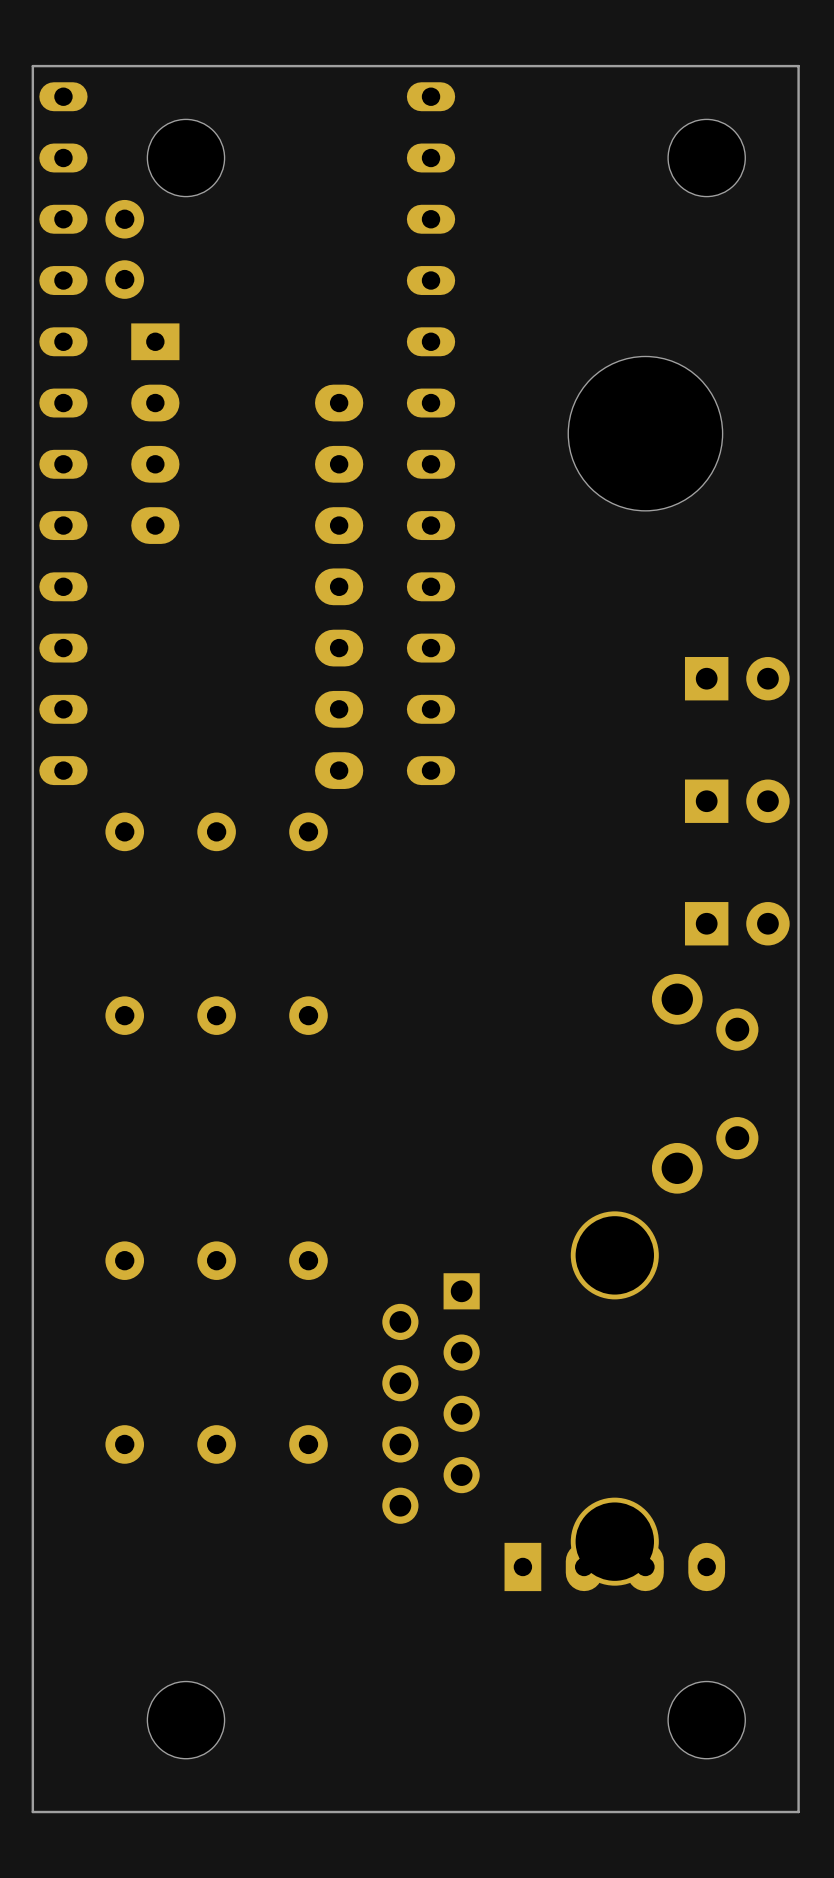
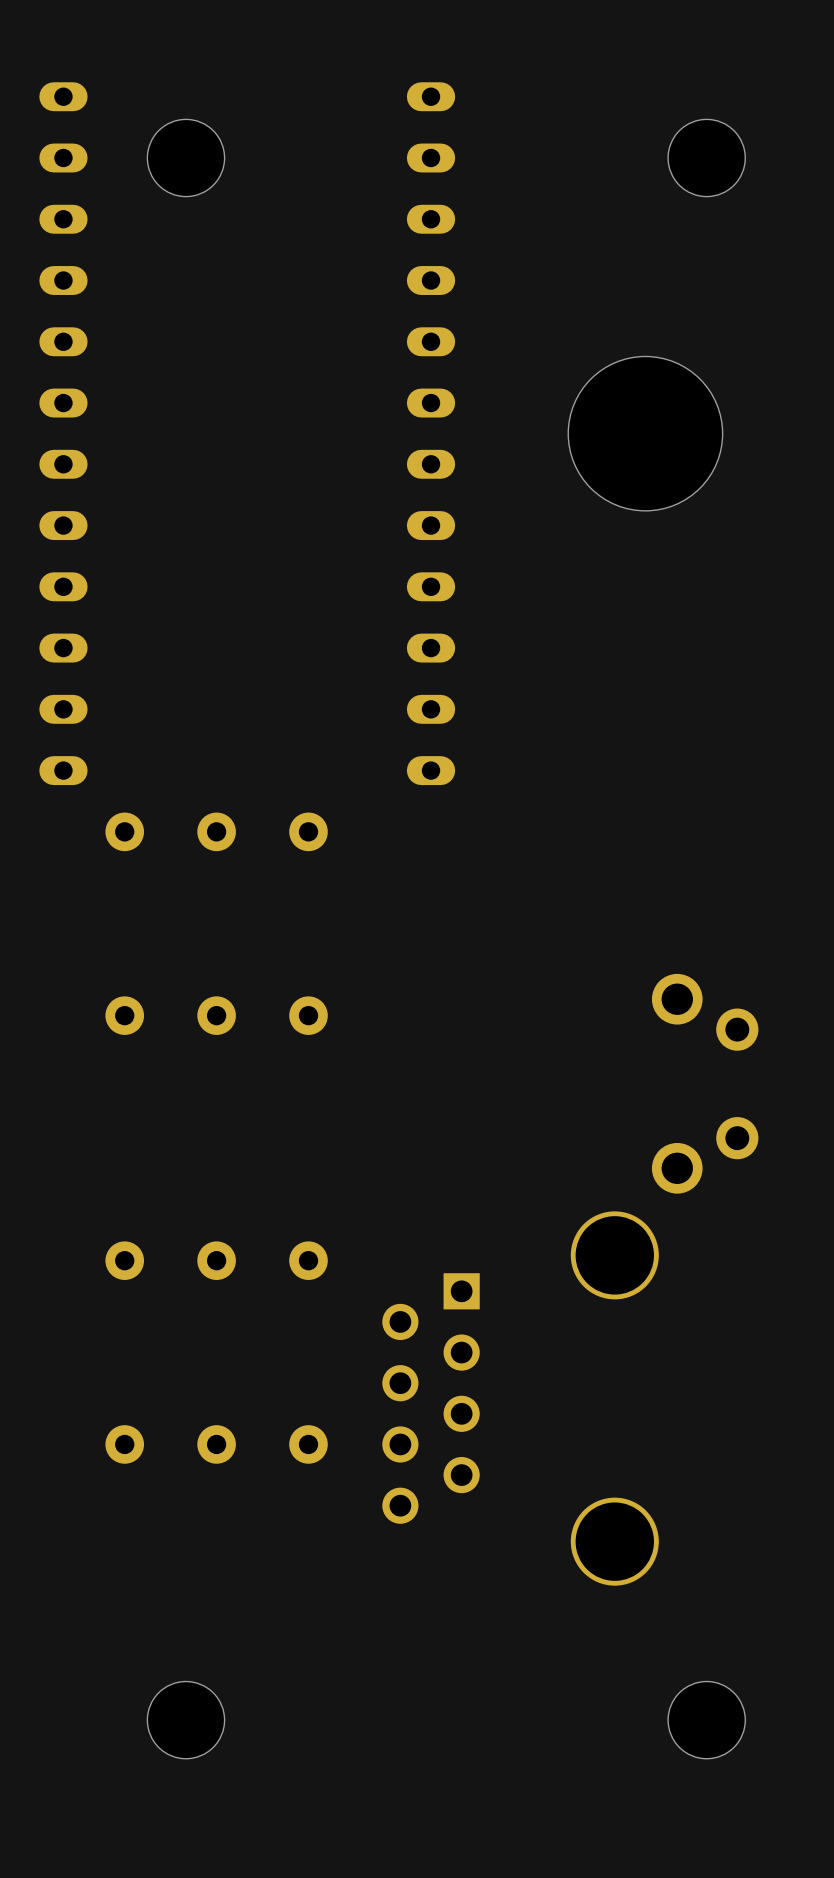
board edge: (798, 66) (798, 1812) (32, 1812) (32, 66) (798, 66) -> none
part: (124, 249) -> none
part: (155, 433) -> none
part: (339, 586) -> none
part: (737, 678) -> none
part: (737, 801) -> none
part: (737, 923) -> none
part: (614, 1566) -> none

